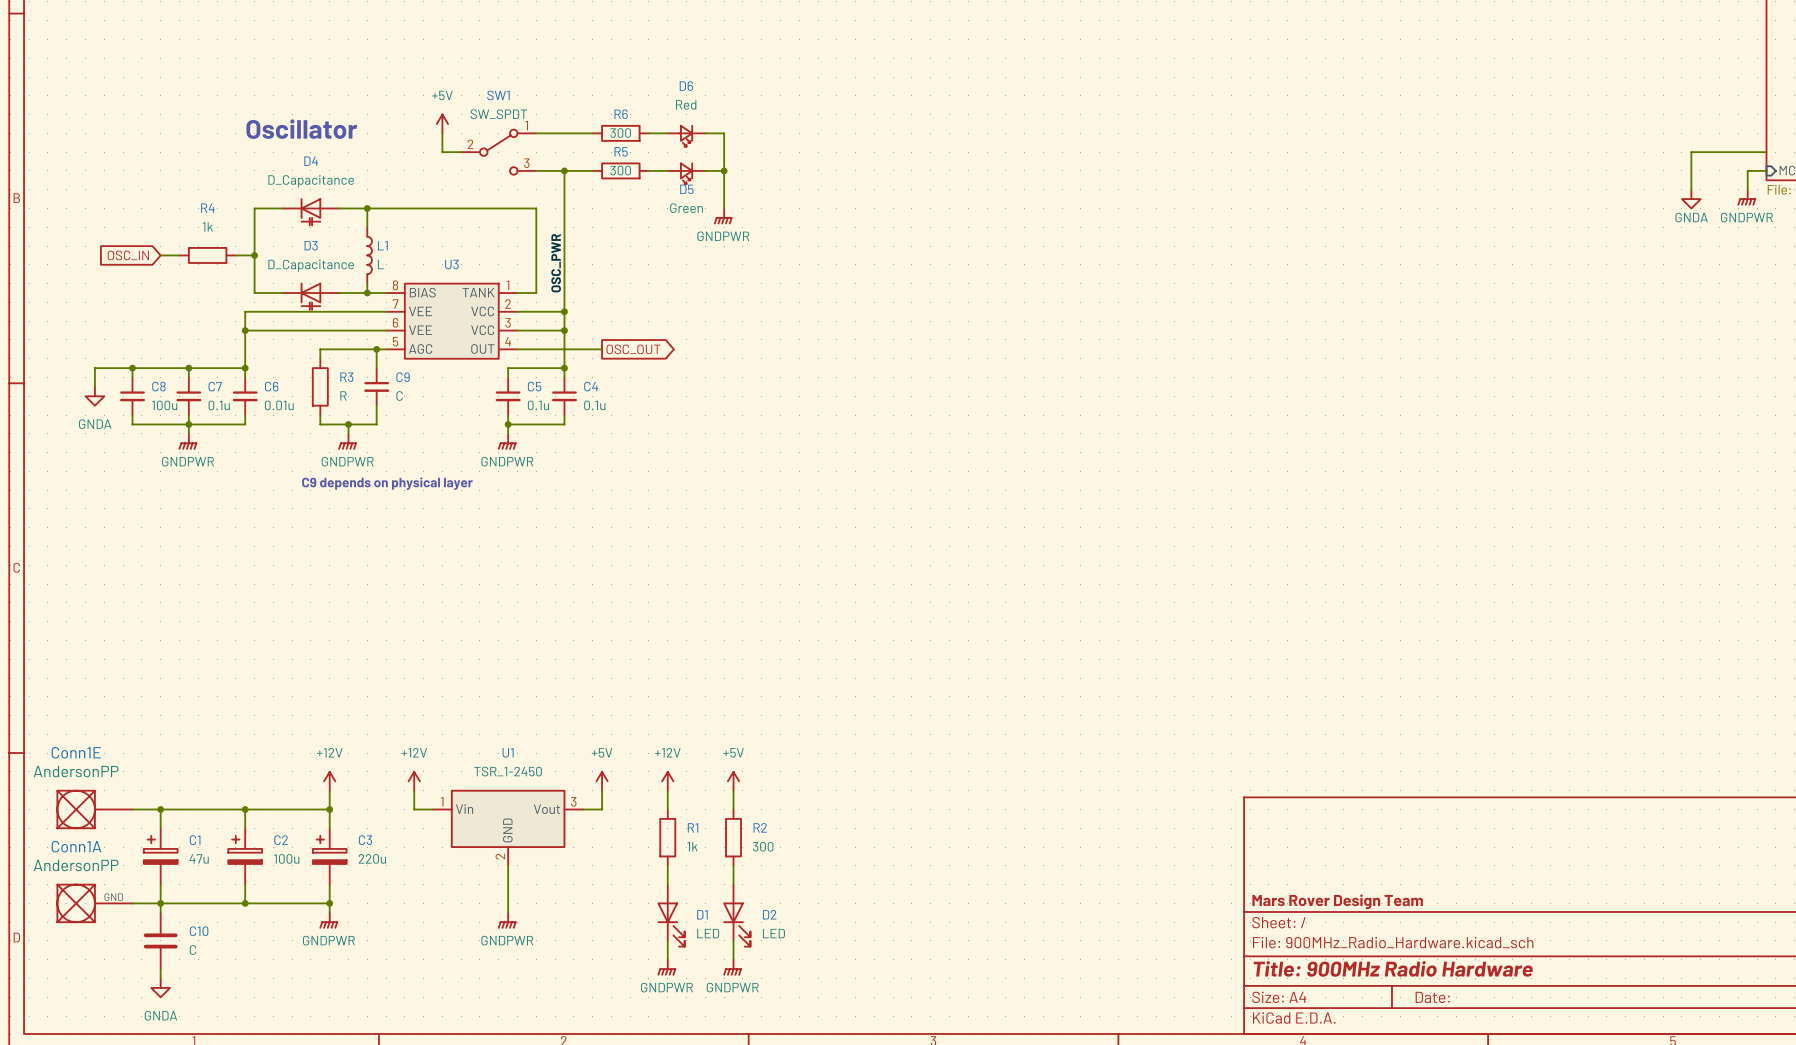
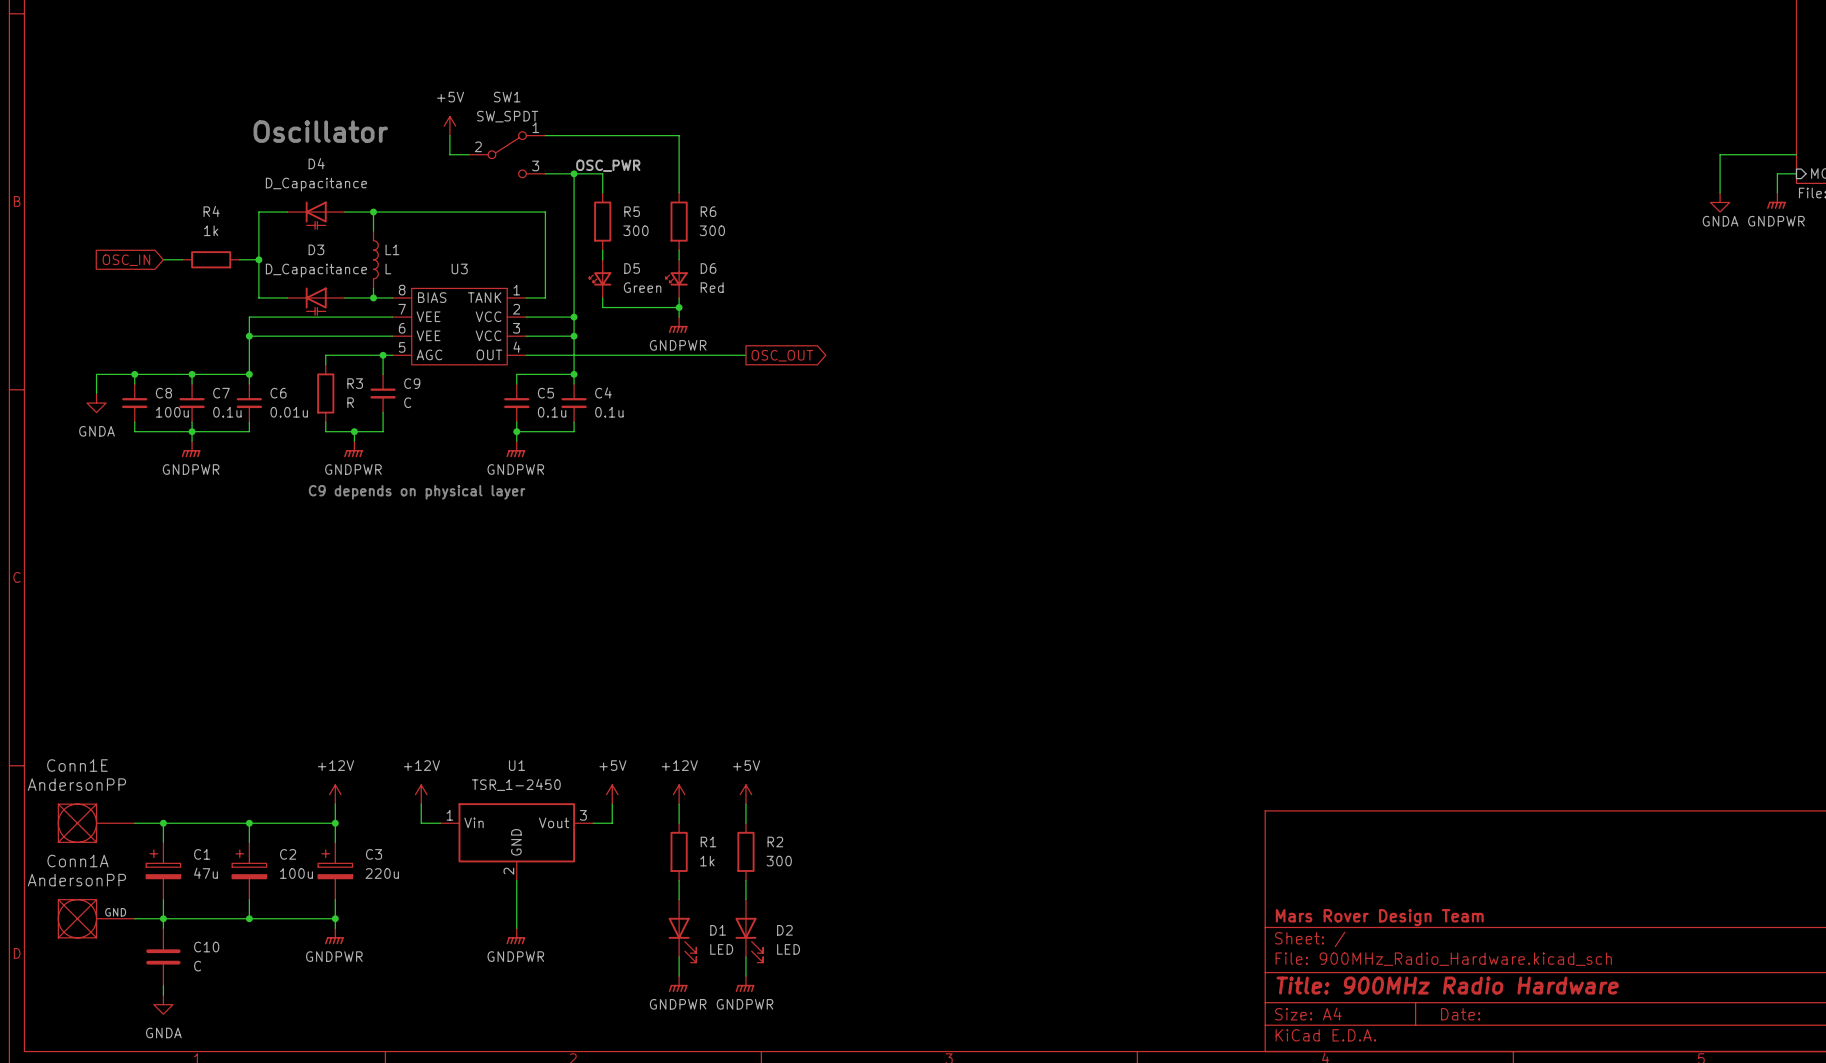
D6 name position: D6 (686, 86) -> D6 (708, 268)
R6 name position: R6 (621, 114) -> R6 (708, 211)
wire: none -> (602, 135) (660, 135)
R6 rotation: 0° (620, 133) -> 90° clockwise (679, 221)
R6 position: (620, 133) -> (679, 221)
R6 value position: 300 (620, 133) -> 300 (712, 230)
wire: none -> (679, 135) (679, 192)
wire: (705, 133) (724, 133) (724, 208) -> none
D6 rotation: 0° (686, 135) -> 90° clockwise (676, 278)
D6 position: (686, 135) -> (676, 278)
R5 name position: R5 (621, 151) -> R5 (632, 211)
wire: none -> (602, 173) (602, 192)
R5 rotation: 0° (620, 170) -> 90° clockwise (602, 221)
R5 position: (620, 170) -> (602, 221)
R5 value position: 300 (620, 170) -> 300 (635, 230)
wire: (648, 170) (667, 170) -> none
wire: (705, 170) (724, 170) -> none
junction: (724, 170) -> none
D5 rotation: 0° (686, 173) -> 90° clockwise (600, 278)
D5 position: (686, 173) -> (600, 278)
D5 name position: D5 (686, 189) -> D5 (632, 268)
D5 value position: Green (686, 208) -> Green (642, 287)
power symbol position: GNDPWR (723, 216) -> GNDPWR (678, 325)
wire: none -> (602, 250) (602, 259)
wire: none -> (679, 250) (679, 259)
label rotation: 0° (556, 263) -> 90° clockwise (608, 165)
label position: OSC_PWR (556, 263) -> OSC_PWR (608, 165)
wire: none -> (602, 297) (602, 307) (679, 307)
wire: none -> (679, 297) (679, 317)
junction: none -> (679, 307)
wire: none -> (612, 355) (745, 355)
global label position: OSC_OUT (633, 349) -> OSC_OUT (782, 355)

